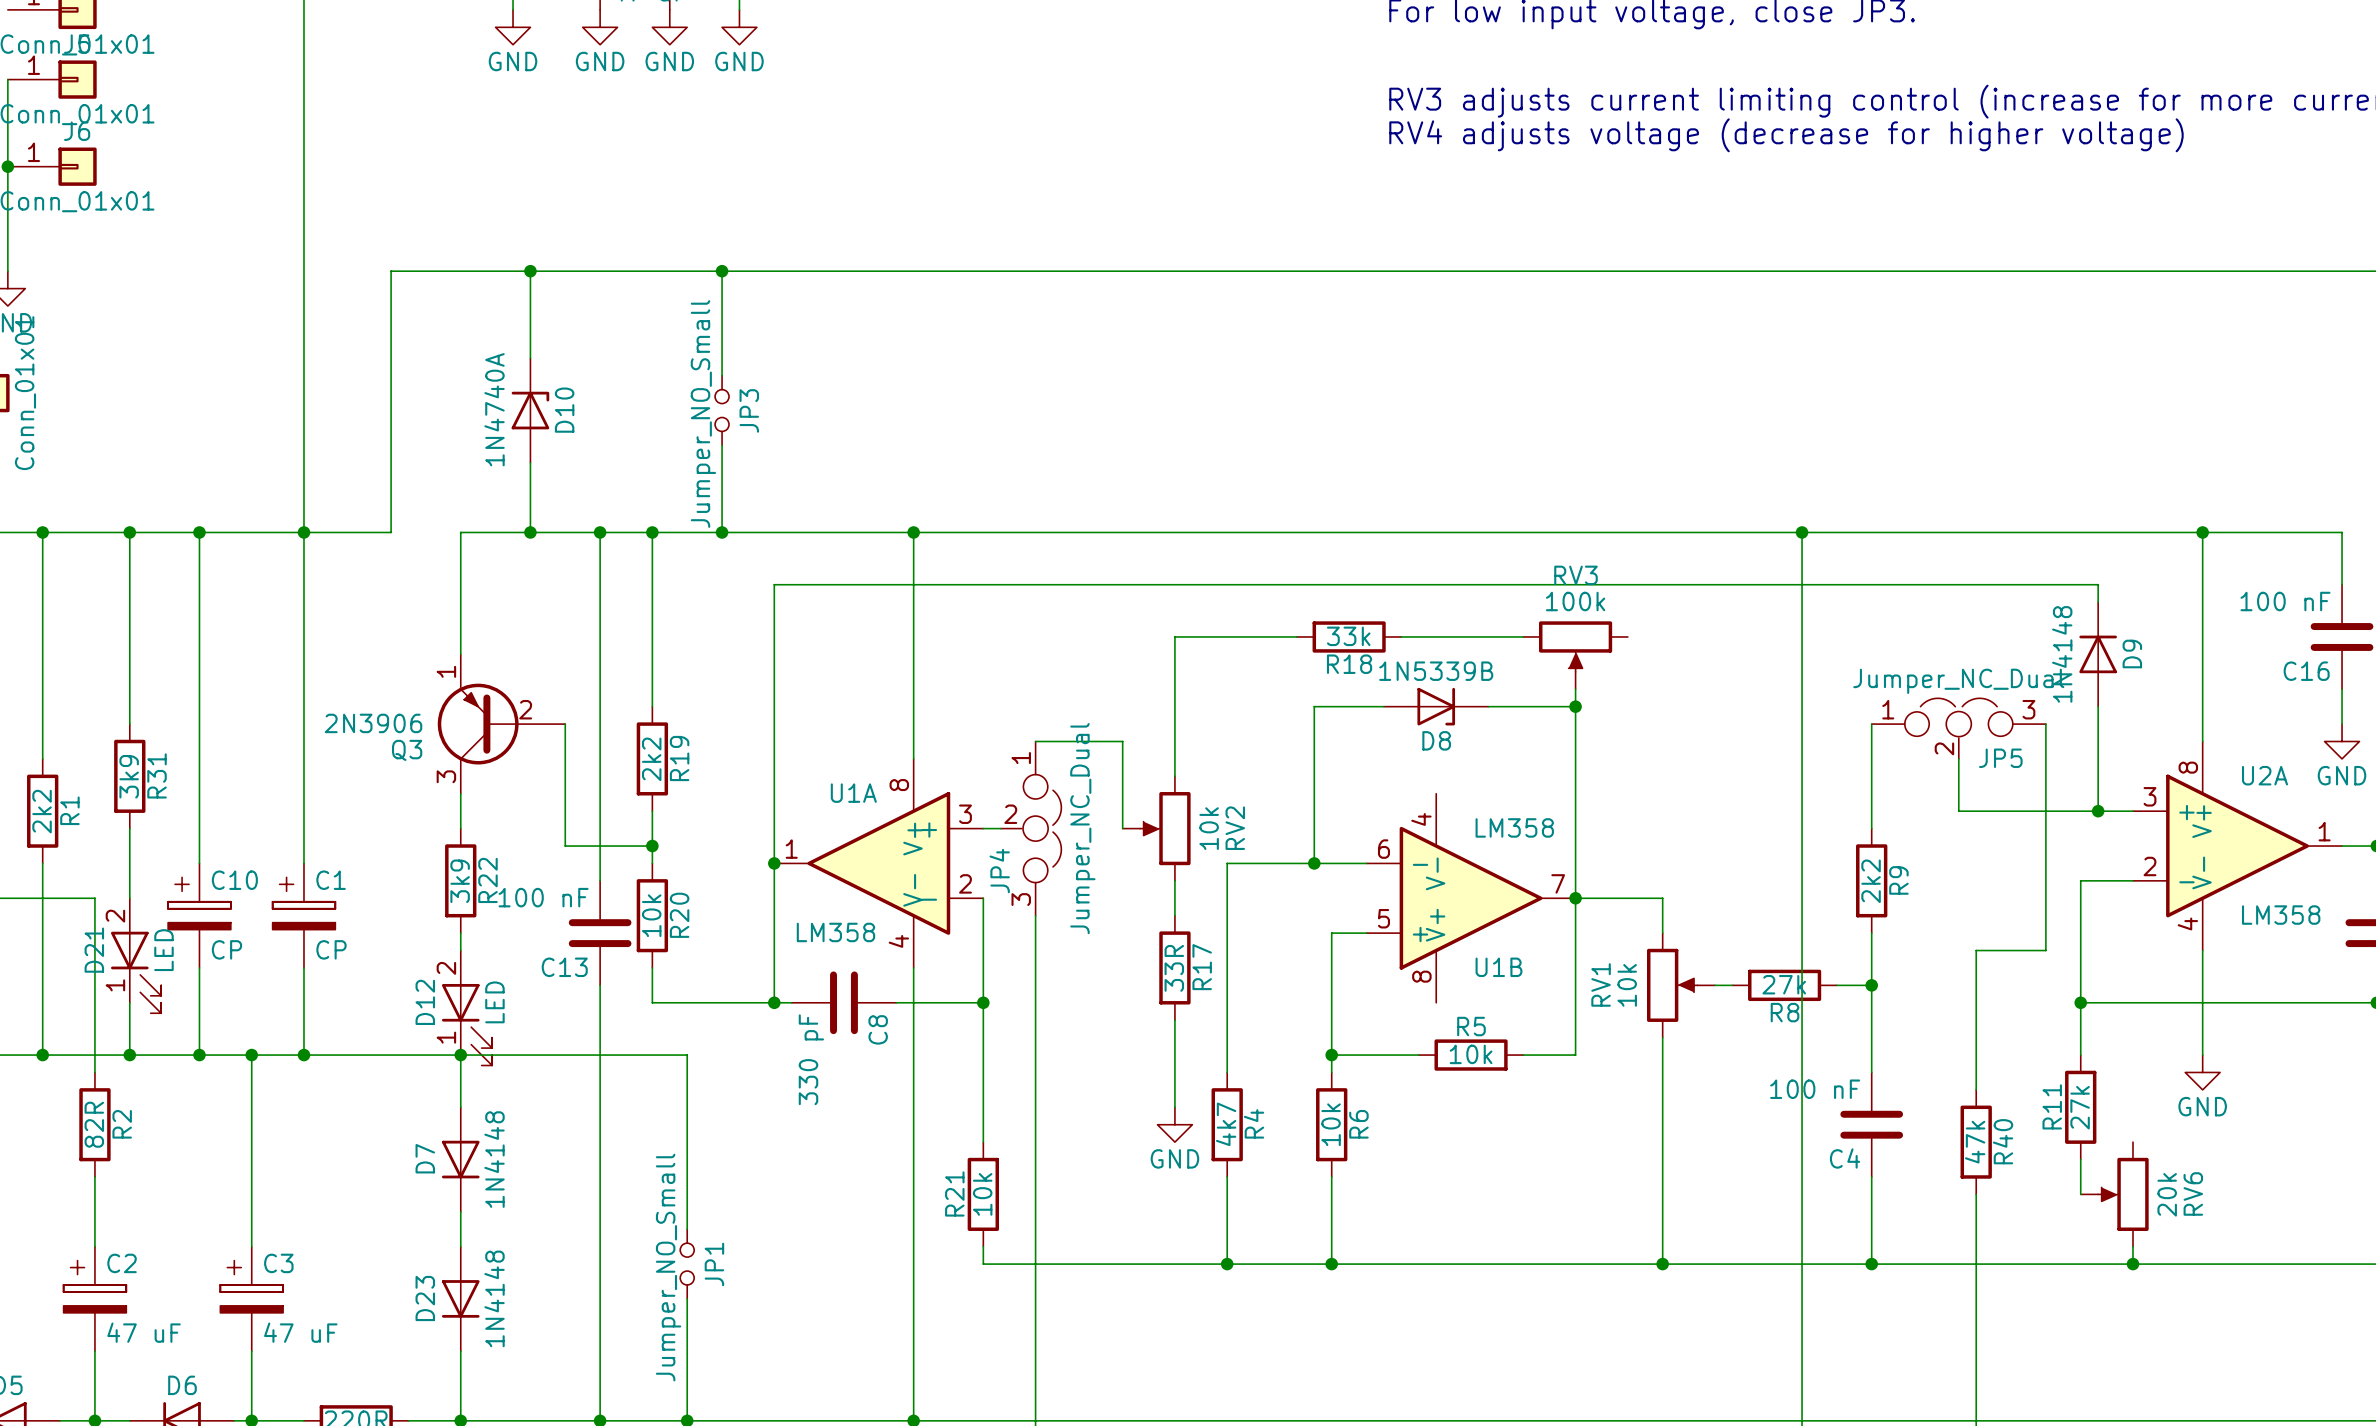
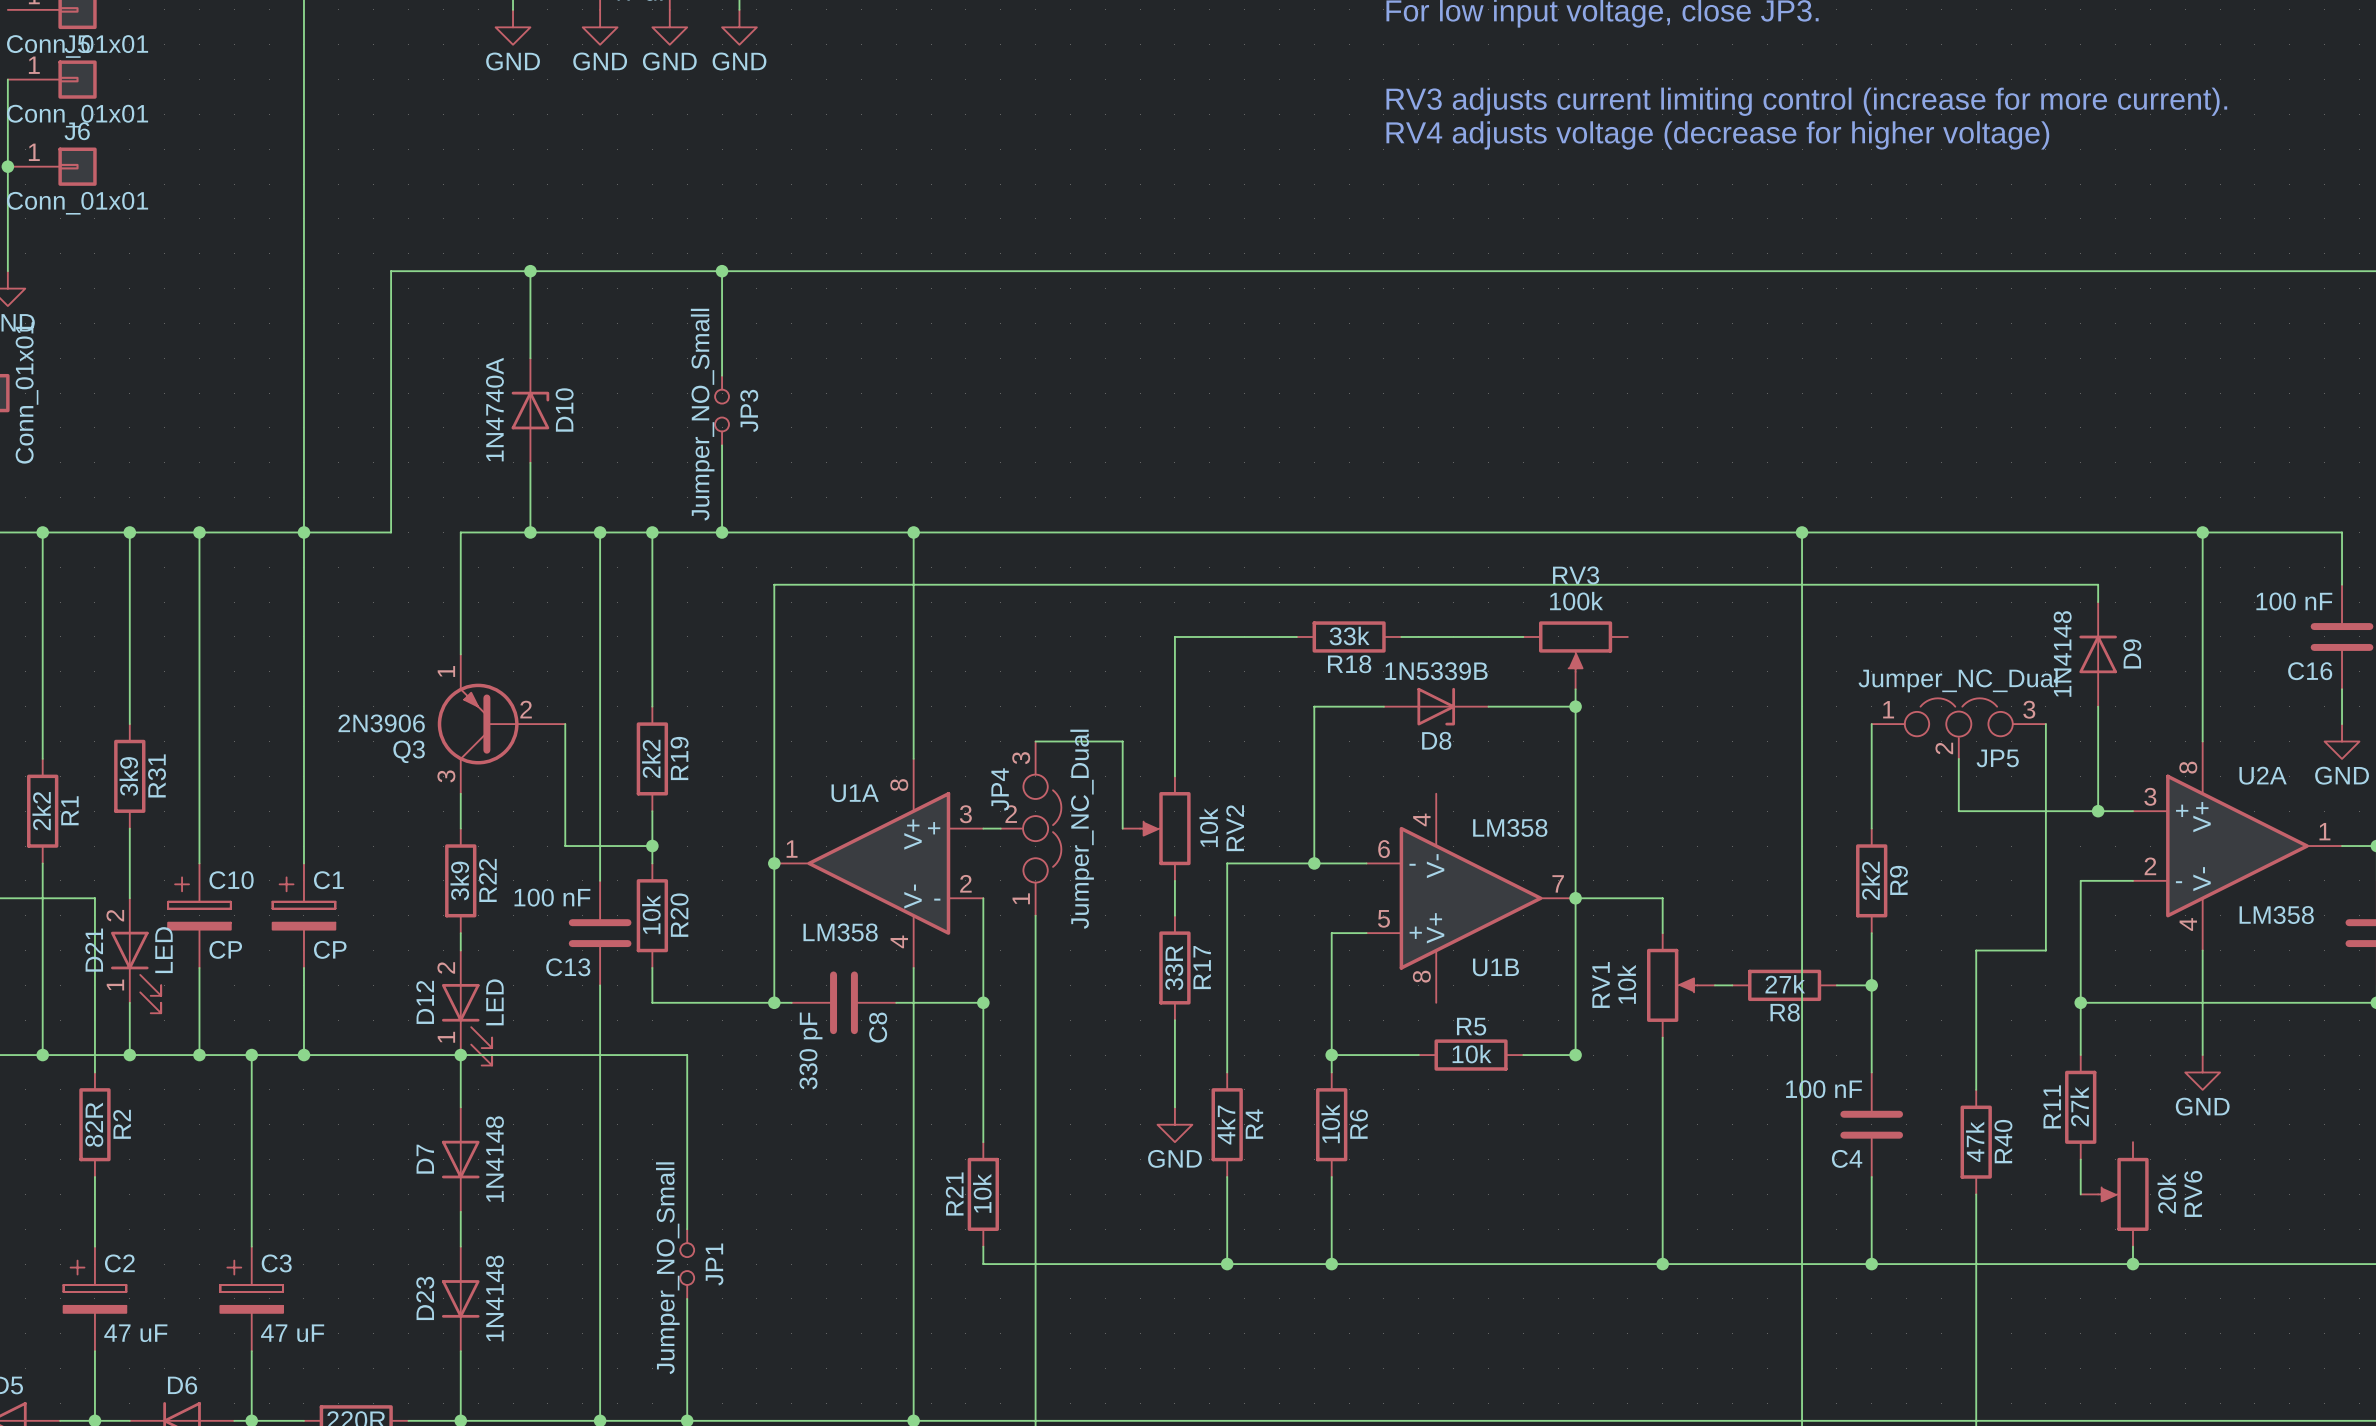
JP4 flip: as is (1042, 828) -> up-down (1042, 828)
junction: none -> (1575, 1055)

